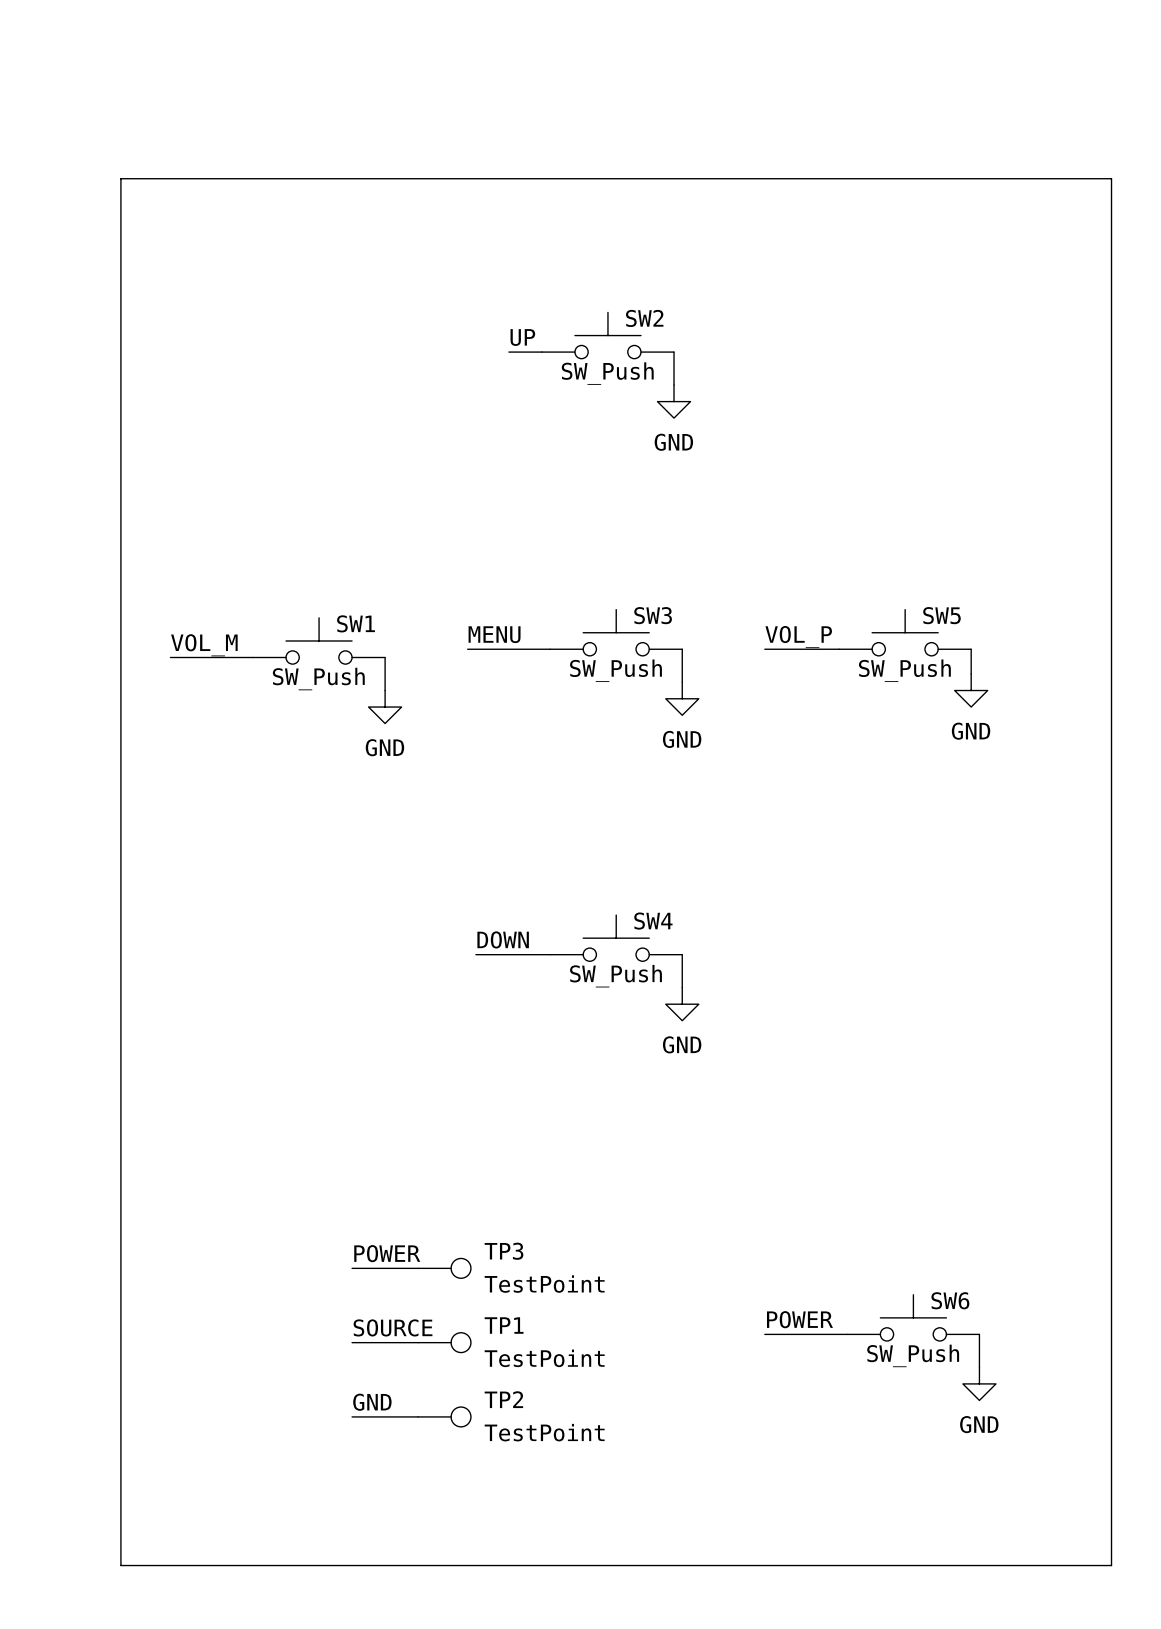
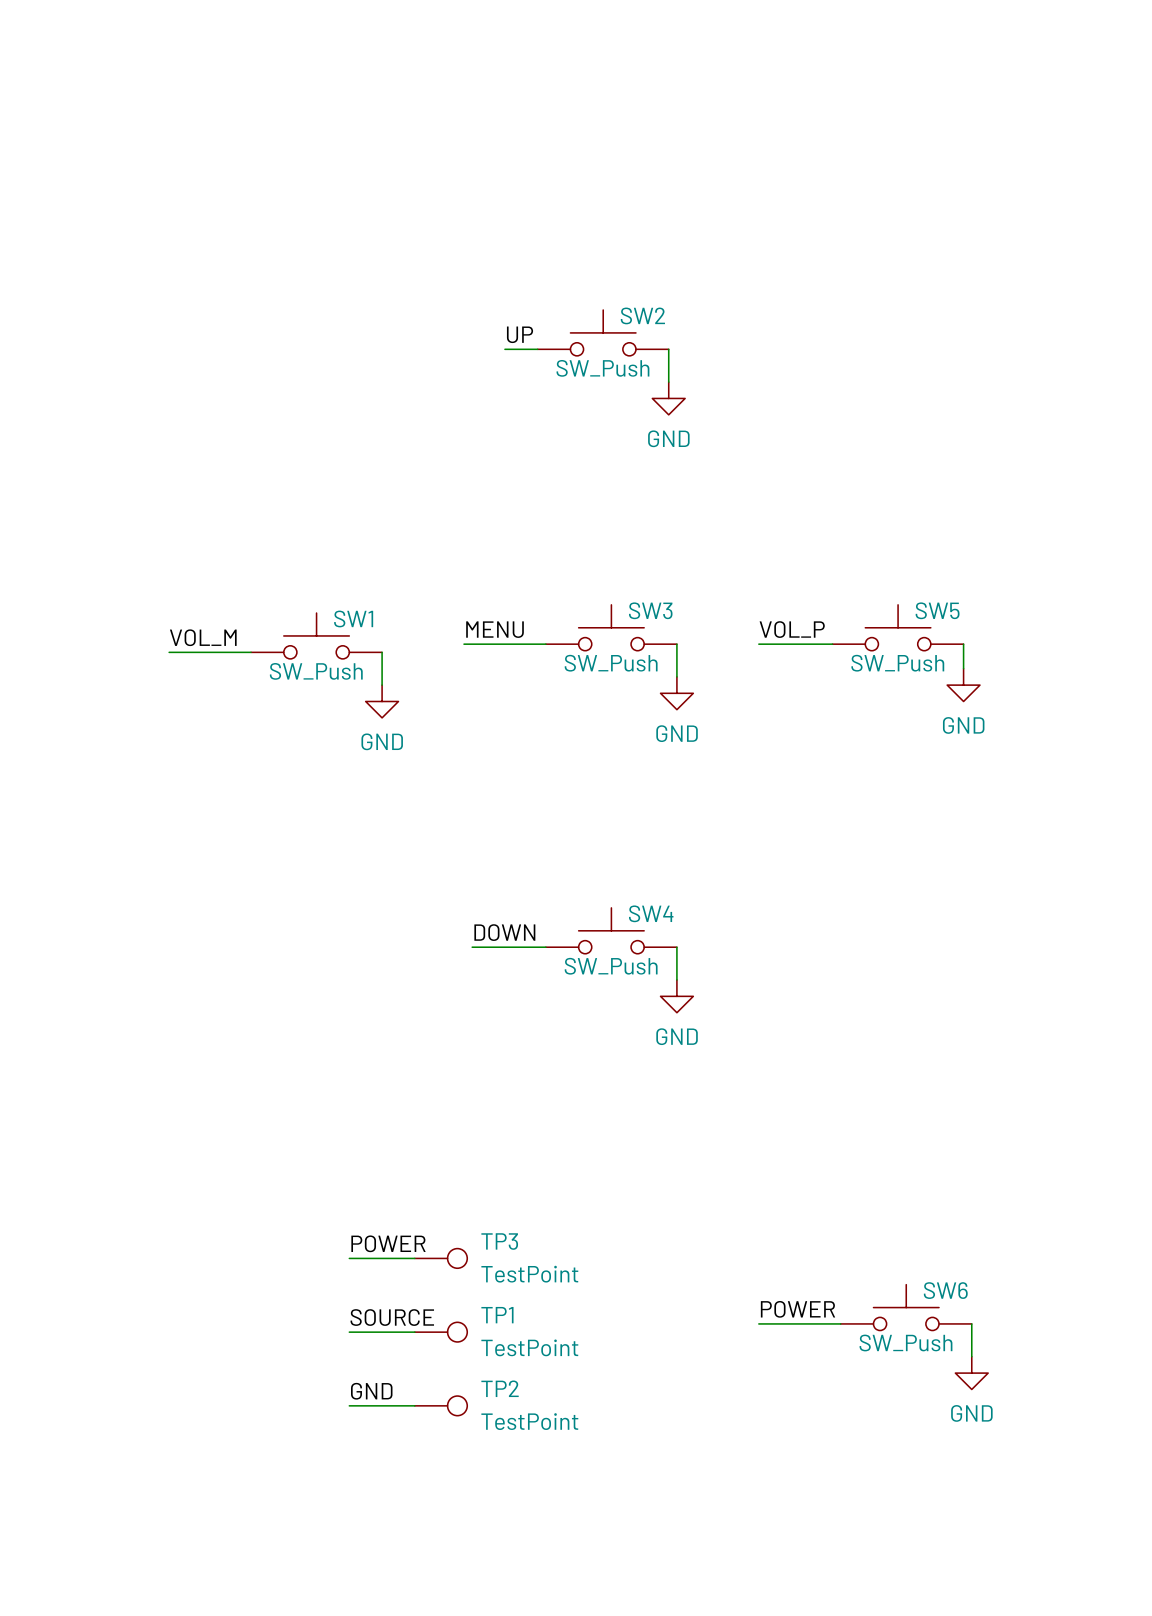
line: (120, 178) (1111, 178) (1111, 1565) (120, 1565) (120, 178) -> none

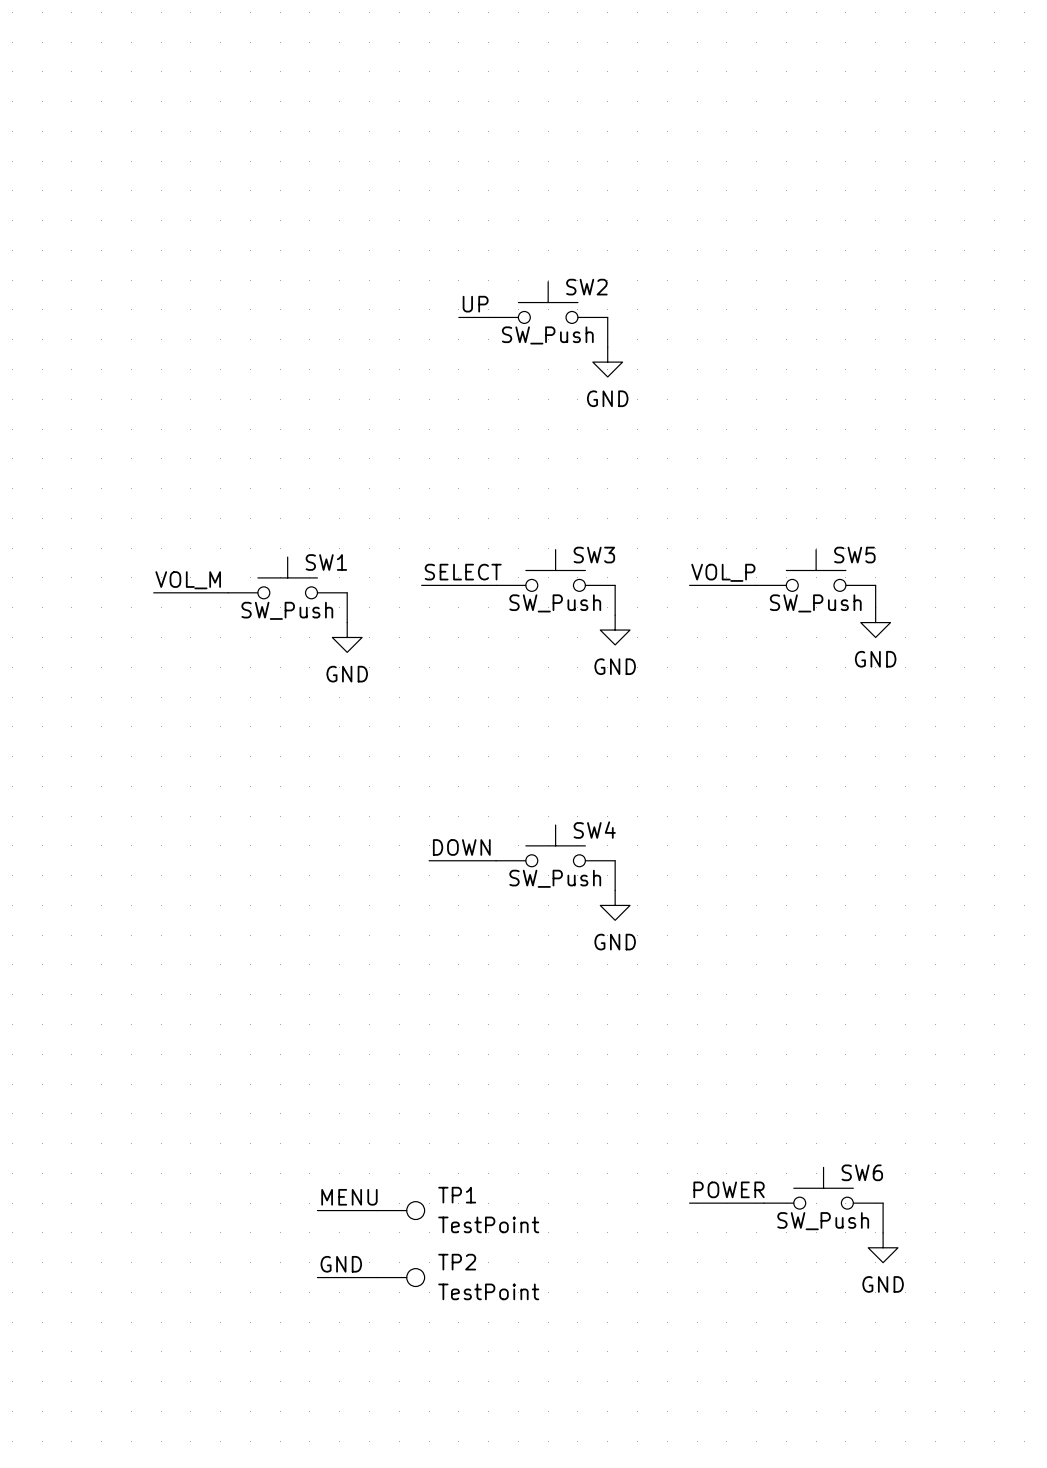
label: MENU (495, 629) -> SELECT (463, 572)
label: POWER (388, 1243) -> none
wire: (349, 1258) (414, 1258) -> none
TP3: TestPoint (441, 1258) -> none
label: SOURCE (392, 1317) -> MENU (349, 1197)

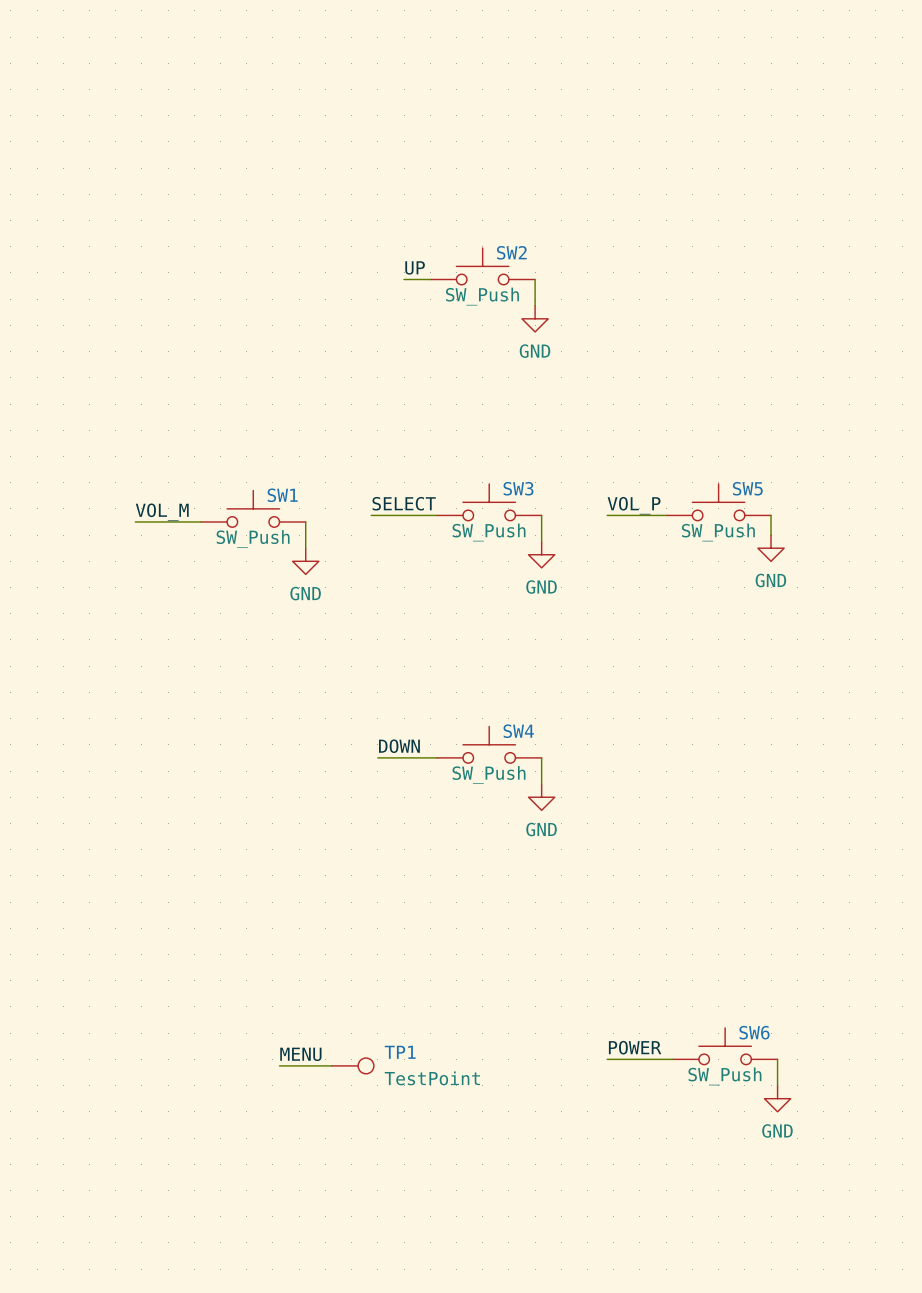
label: GND (341, 1264) -> none
wire: (317, 1277) (376, 1277) -> none
TP2: TestPoint (400, 1277) -> none

